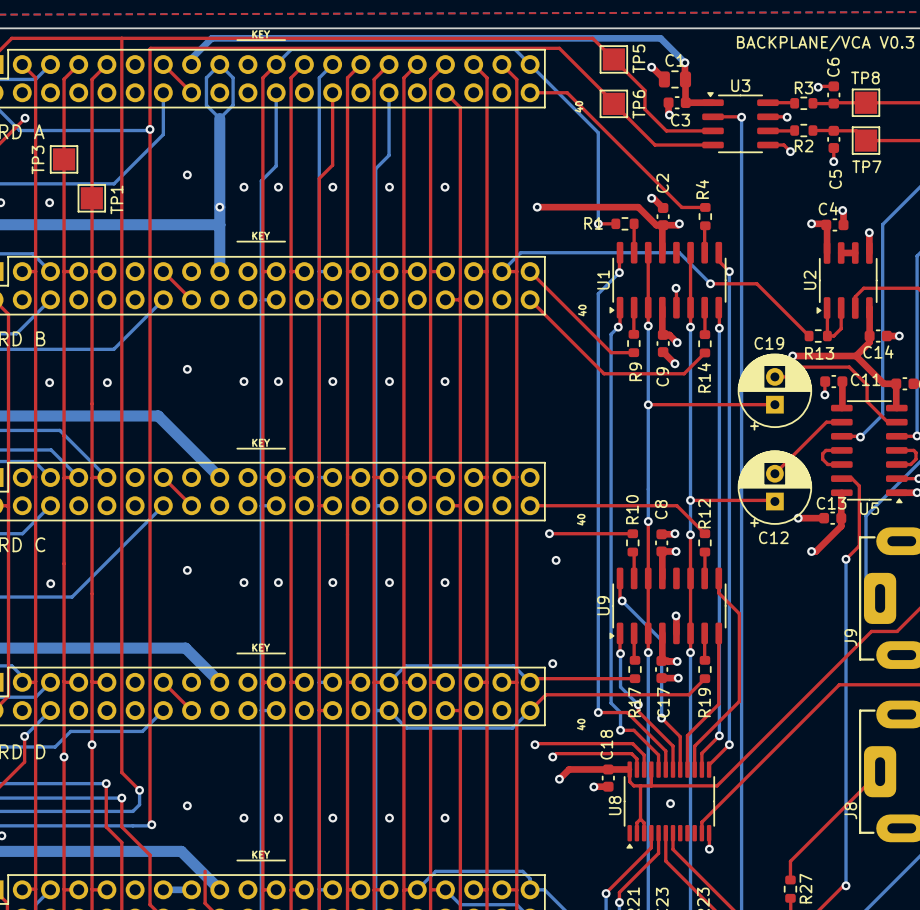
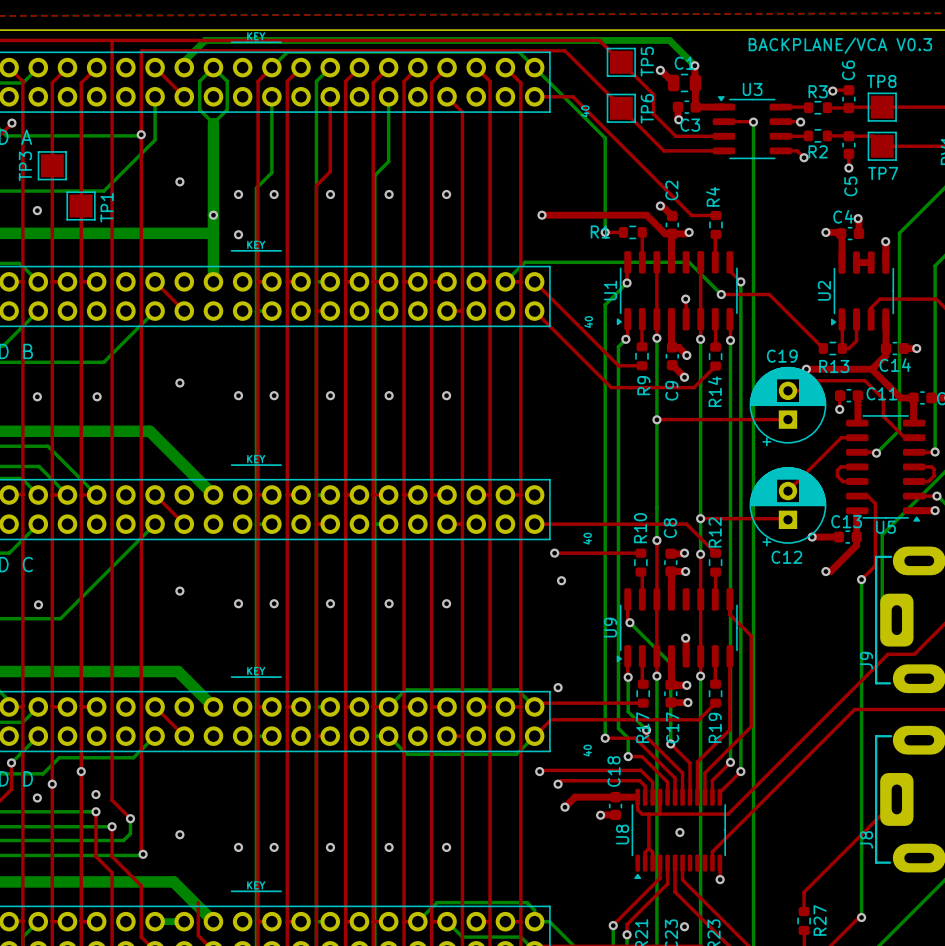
via: none -> (238, 234)
via: none -> (95, 794)
via: none -> (37, 797)
via: none -> (684, 926)

